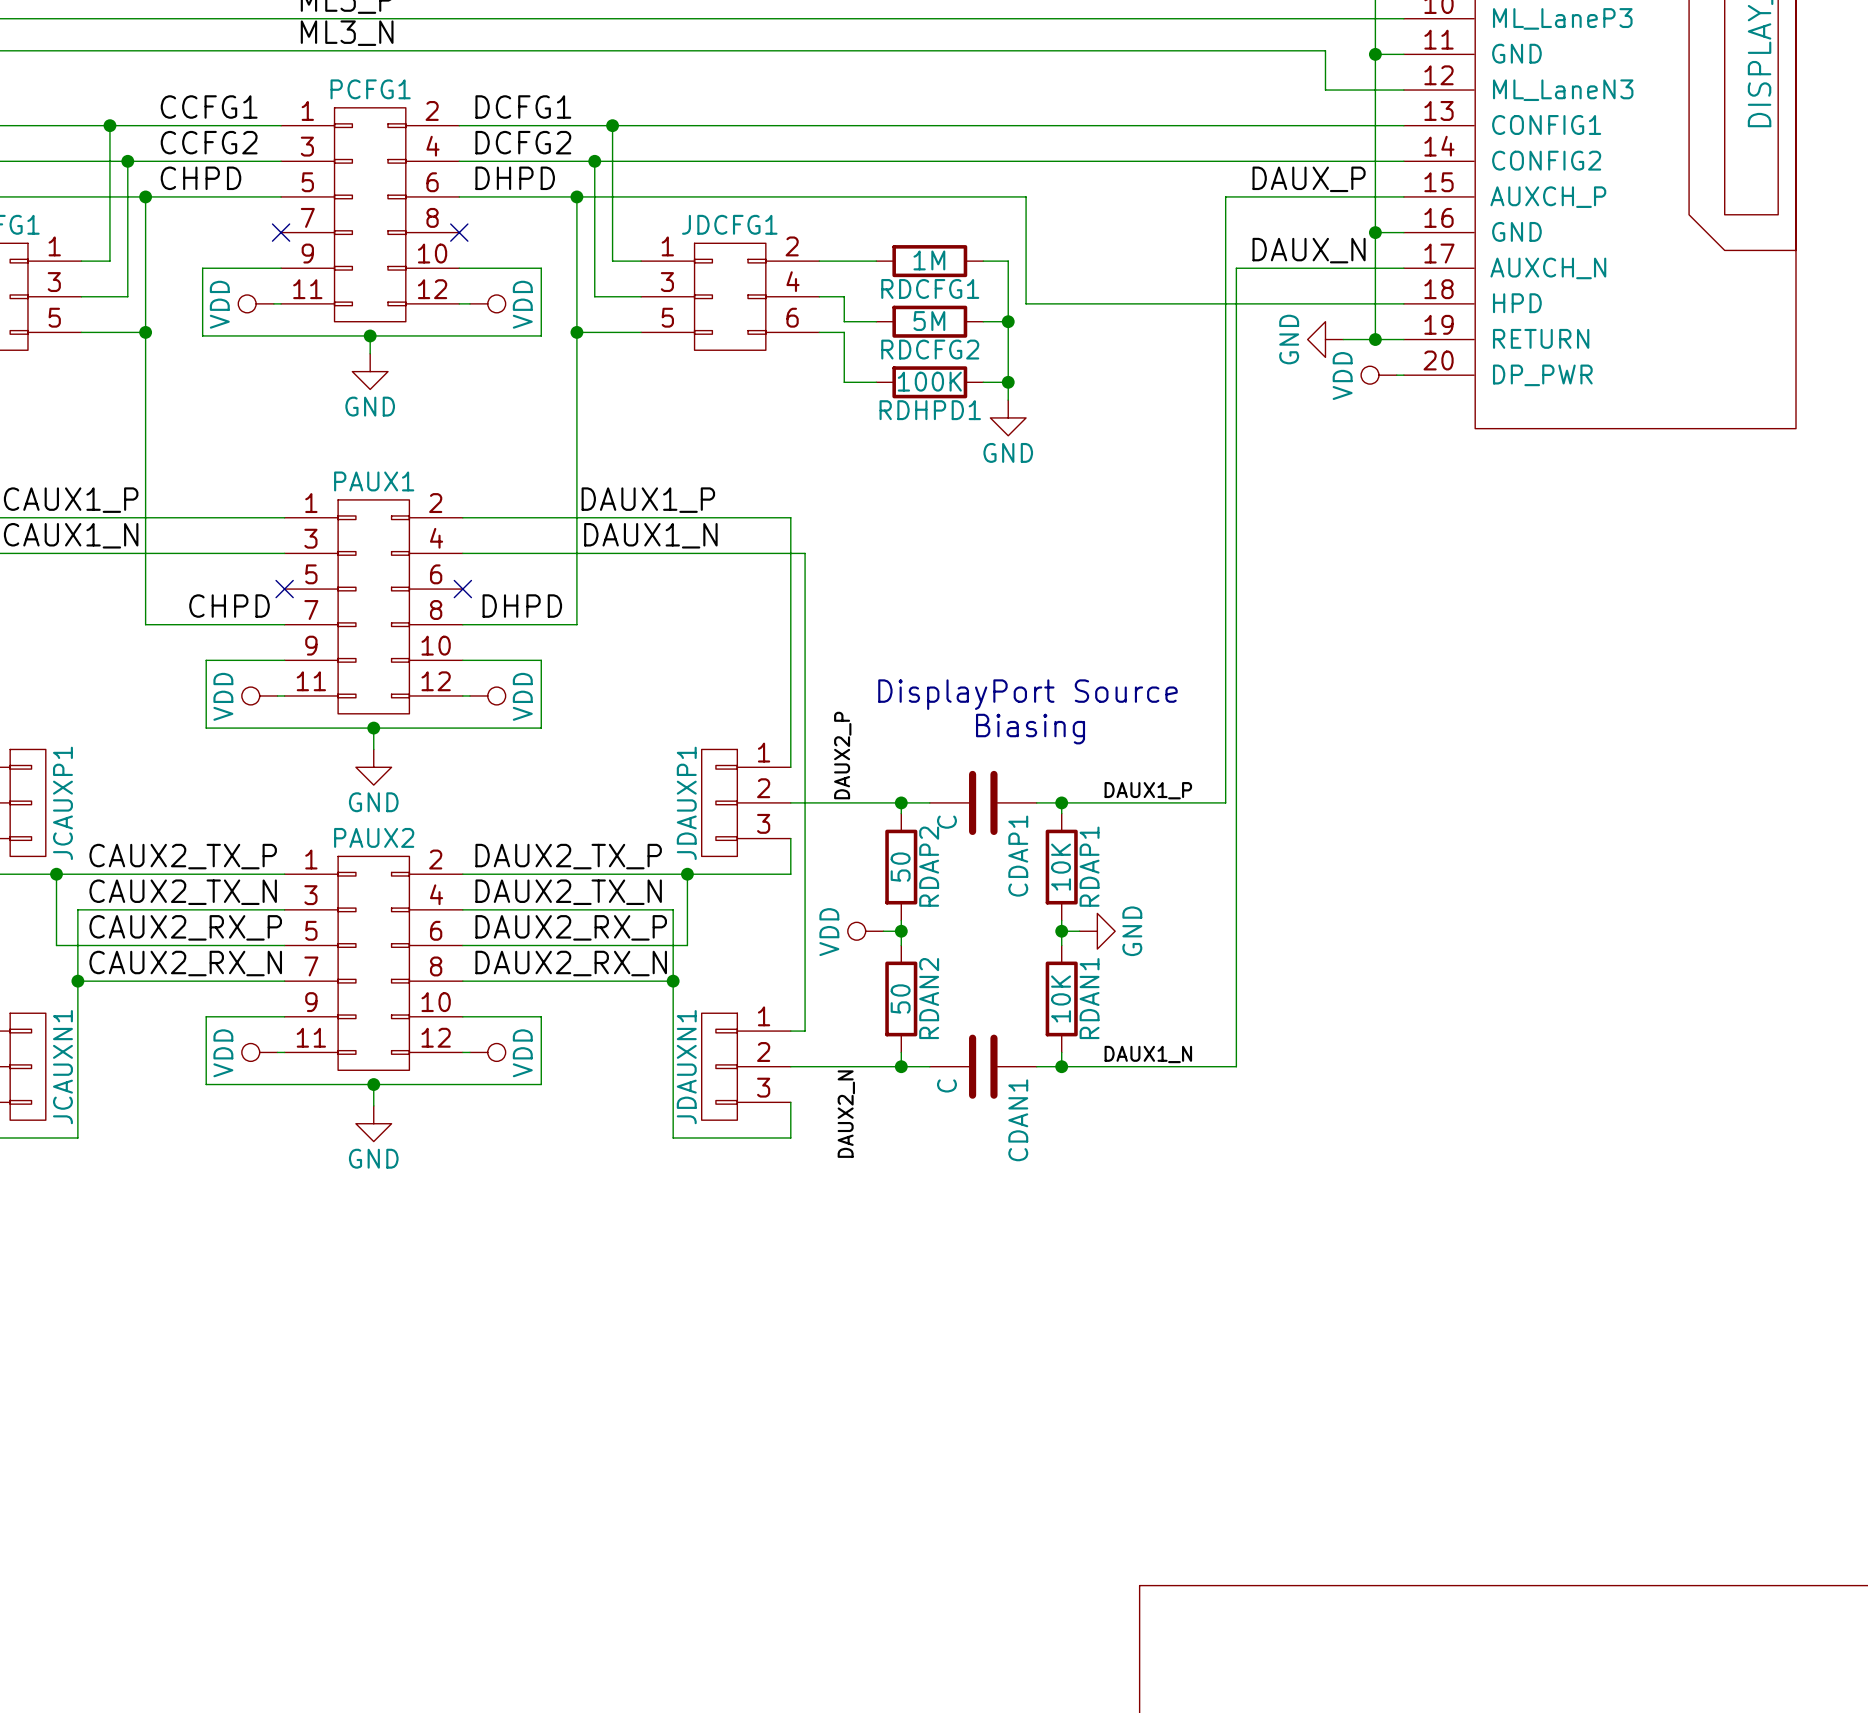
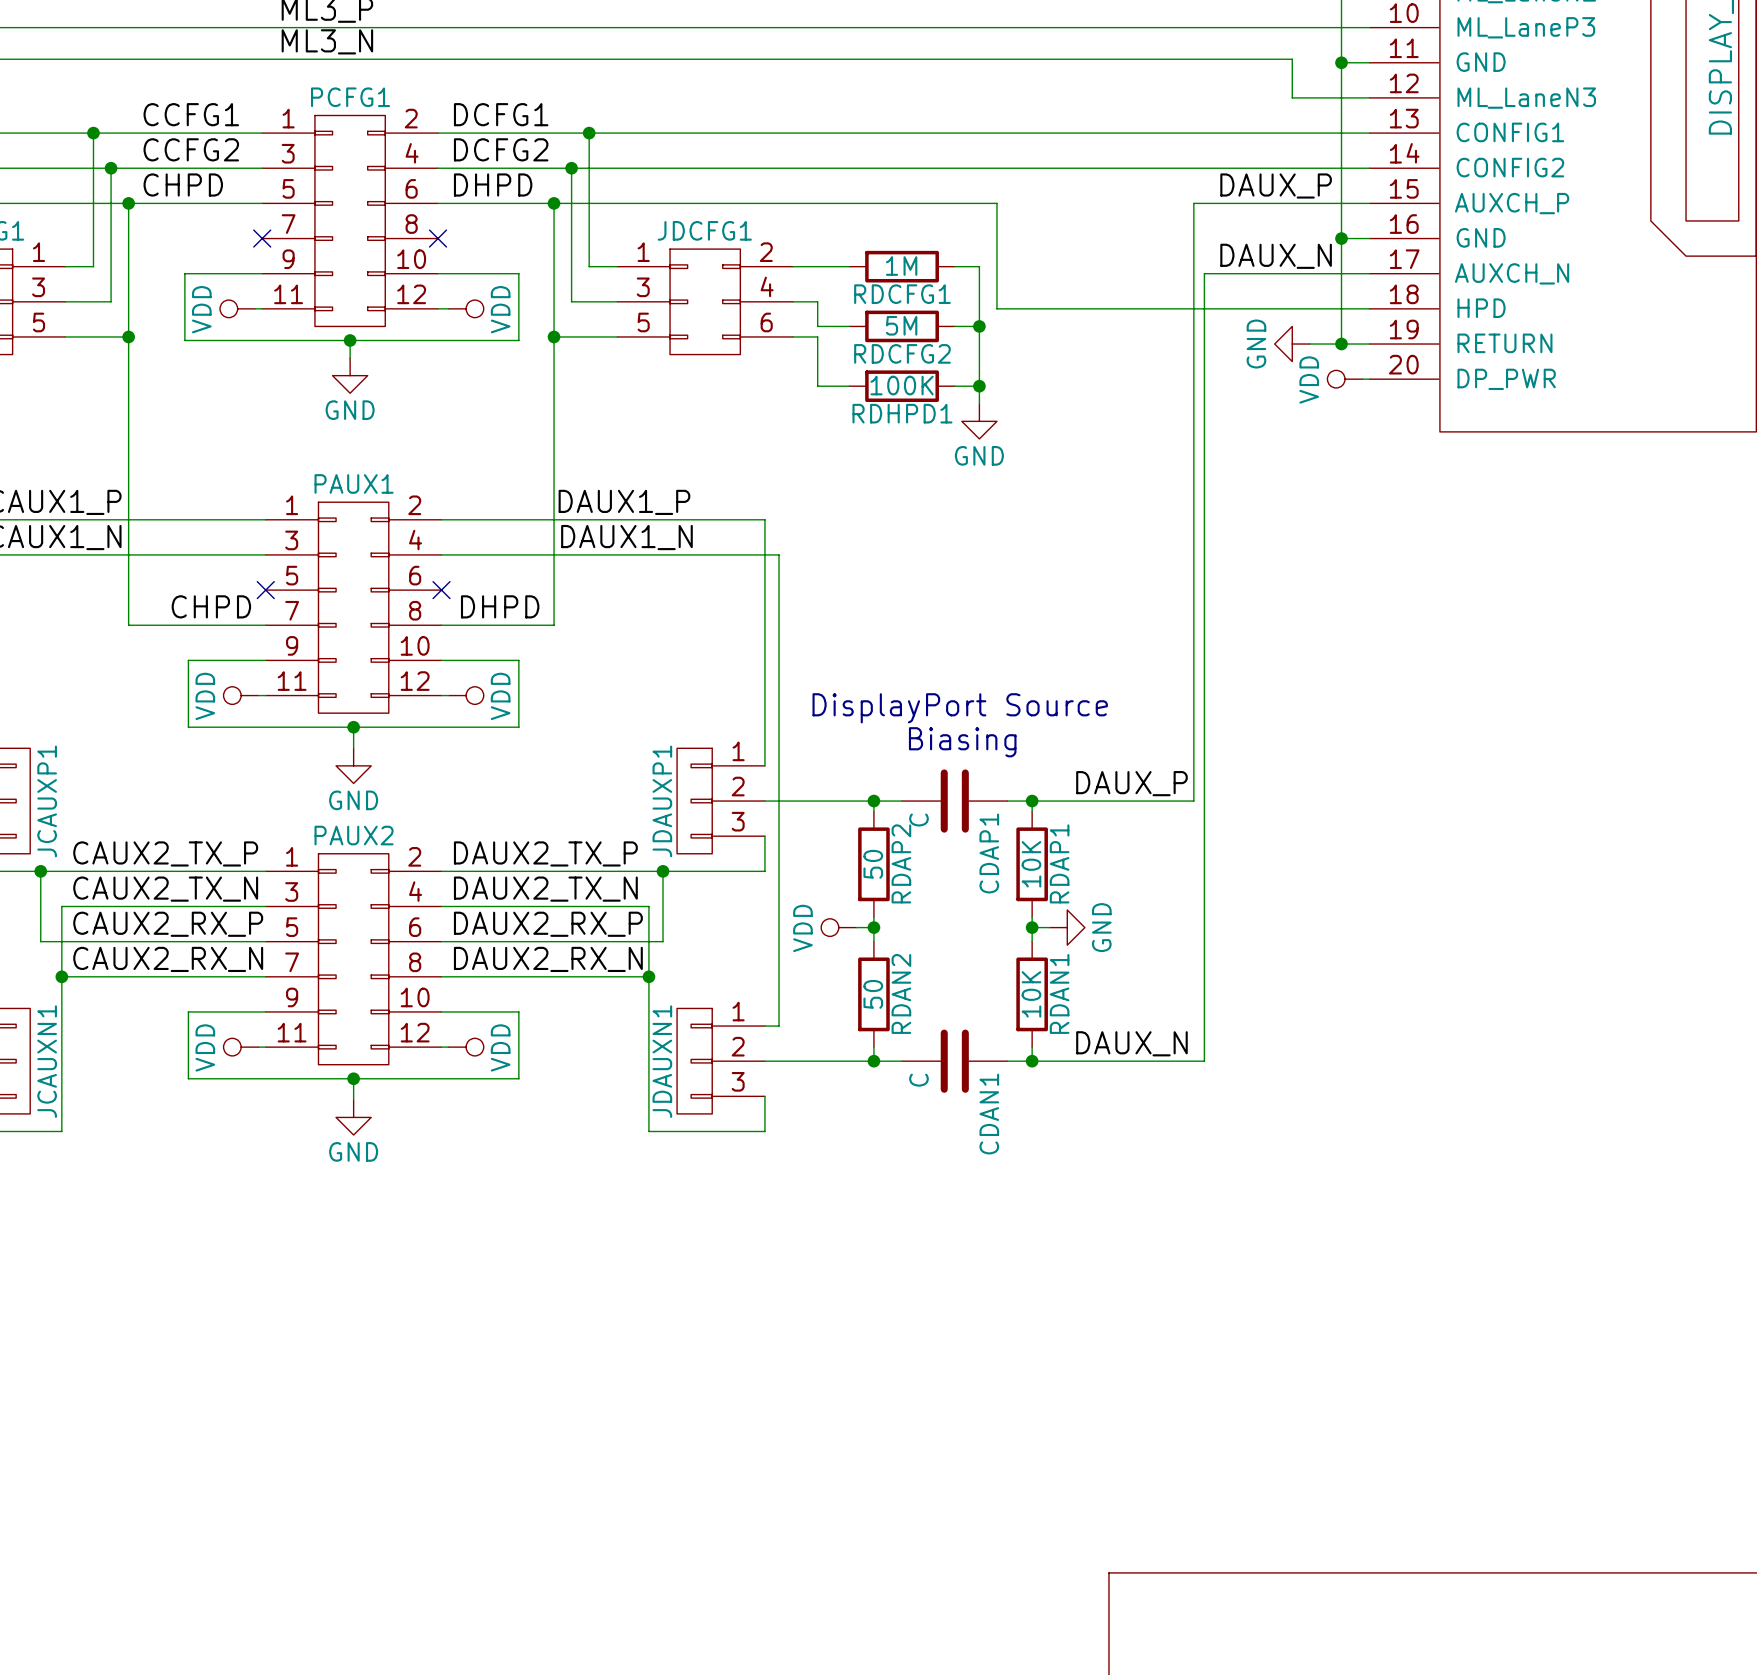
text position: DisplayPort Source (1027, 694) -> DisplayPort Source (960, 708)
text position: Biasing (1030, 729) -> Biasing (962, 742)
label: DAUX2_P (842, 755) -> none
label: DAUX1_P (1148, 790) -> DAUX_P (1131, 783)
label: DAUX1_N (1148, 1054) -> DAUX_N (1131, 1043)
label: DAUX2_N (846, 1114) -> none

